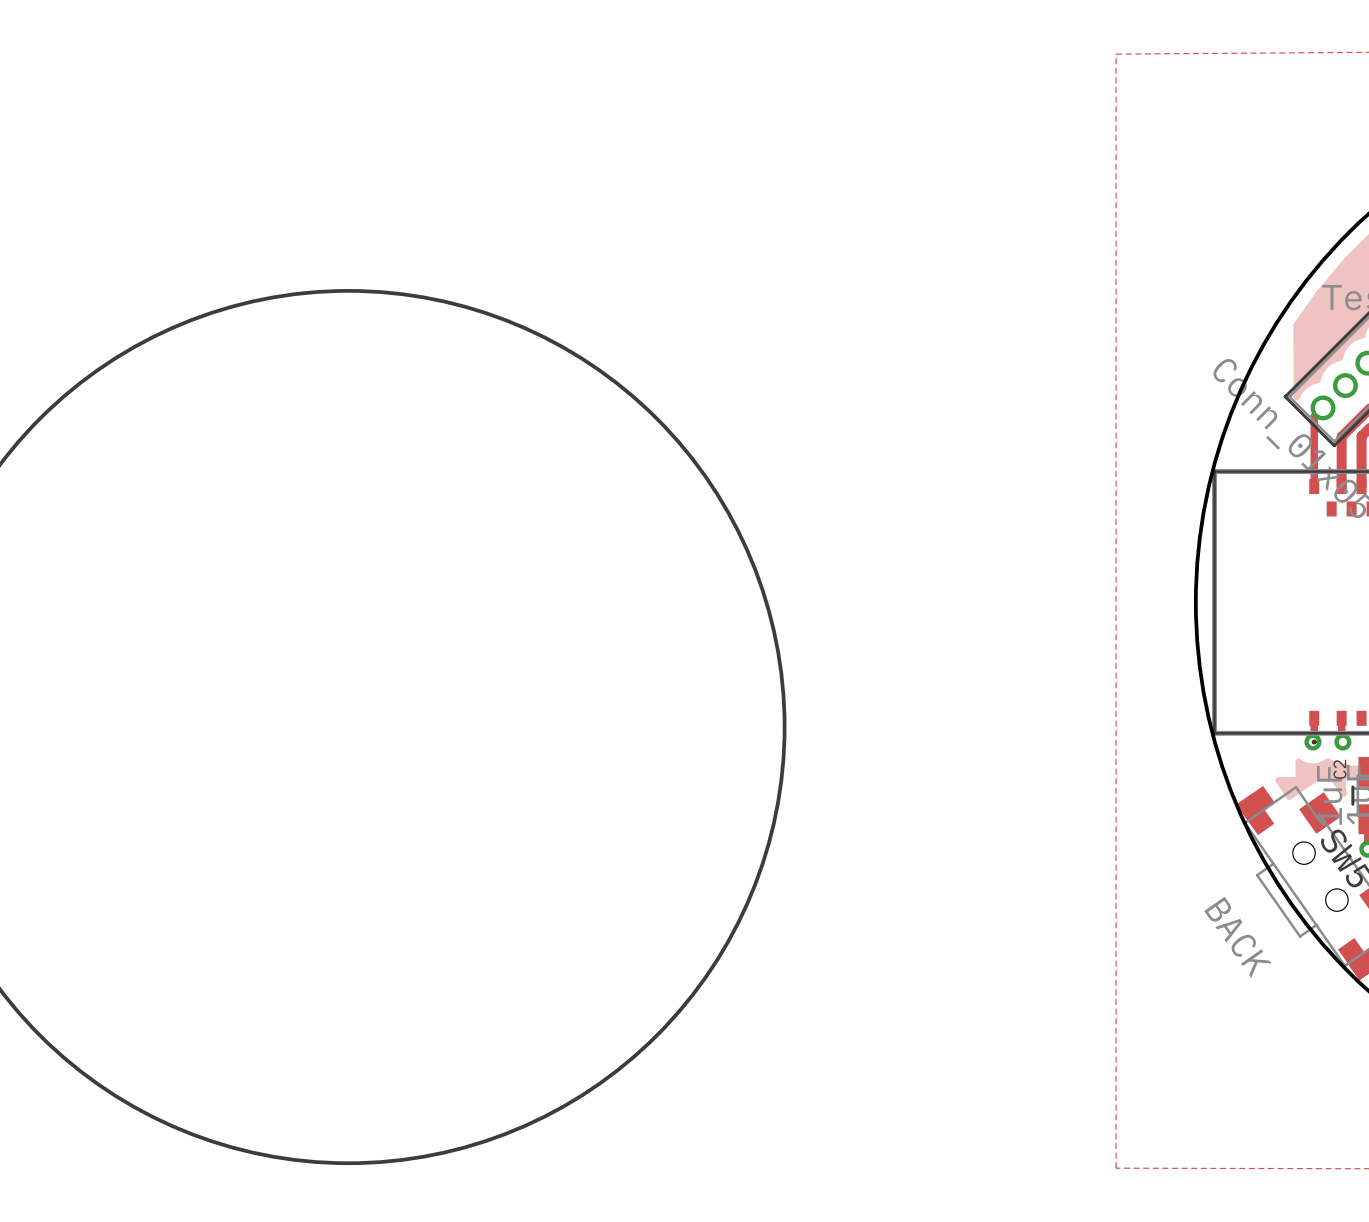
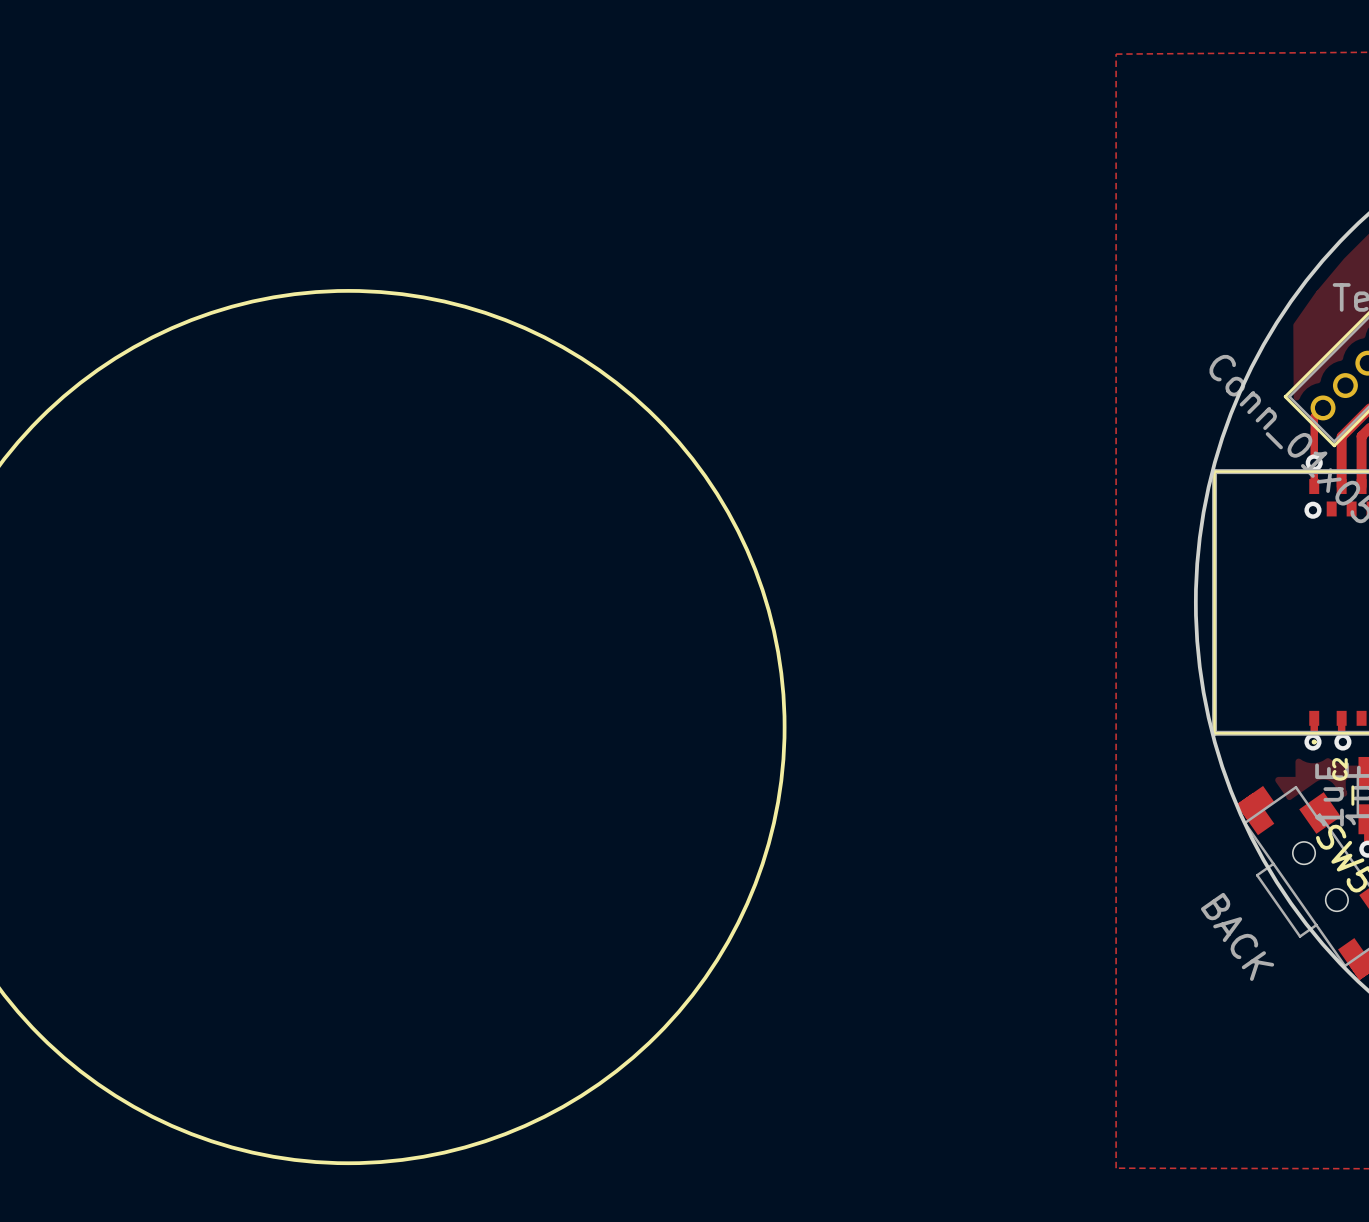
via: none -> (1314, 462)
via: none -> (1312, 510)

